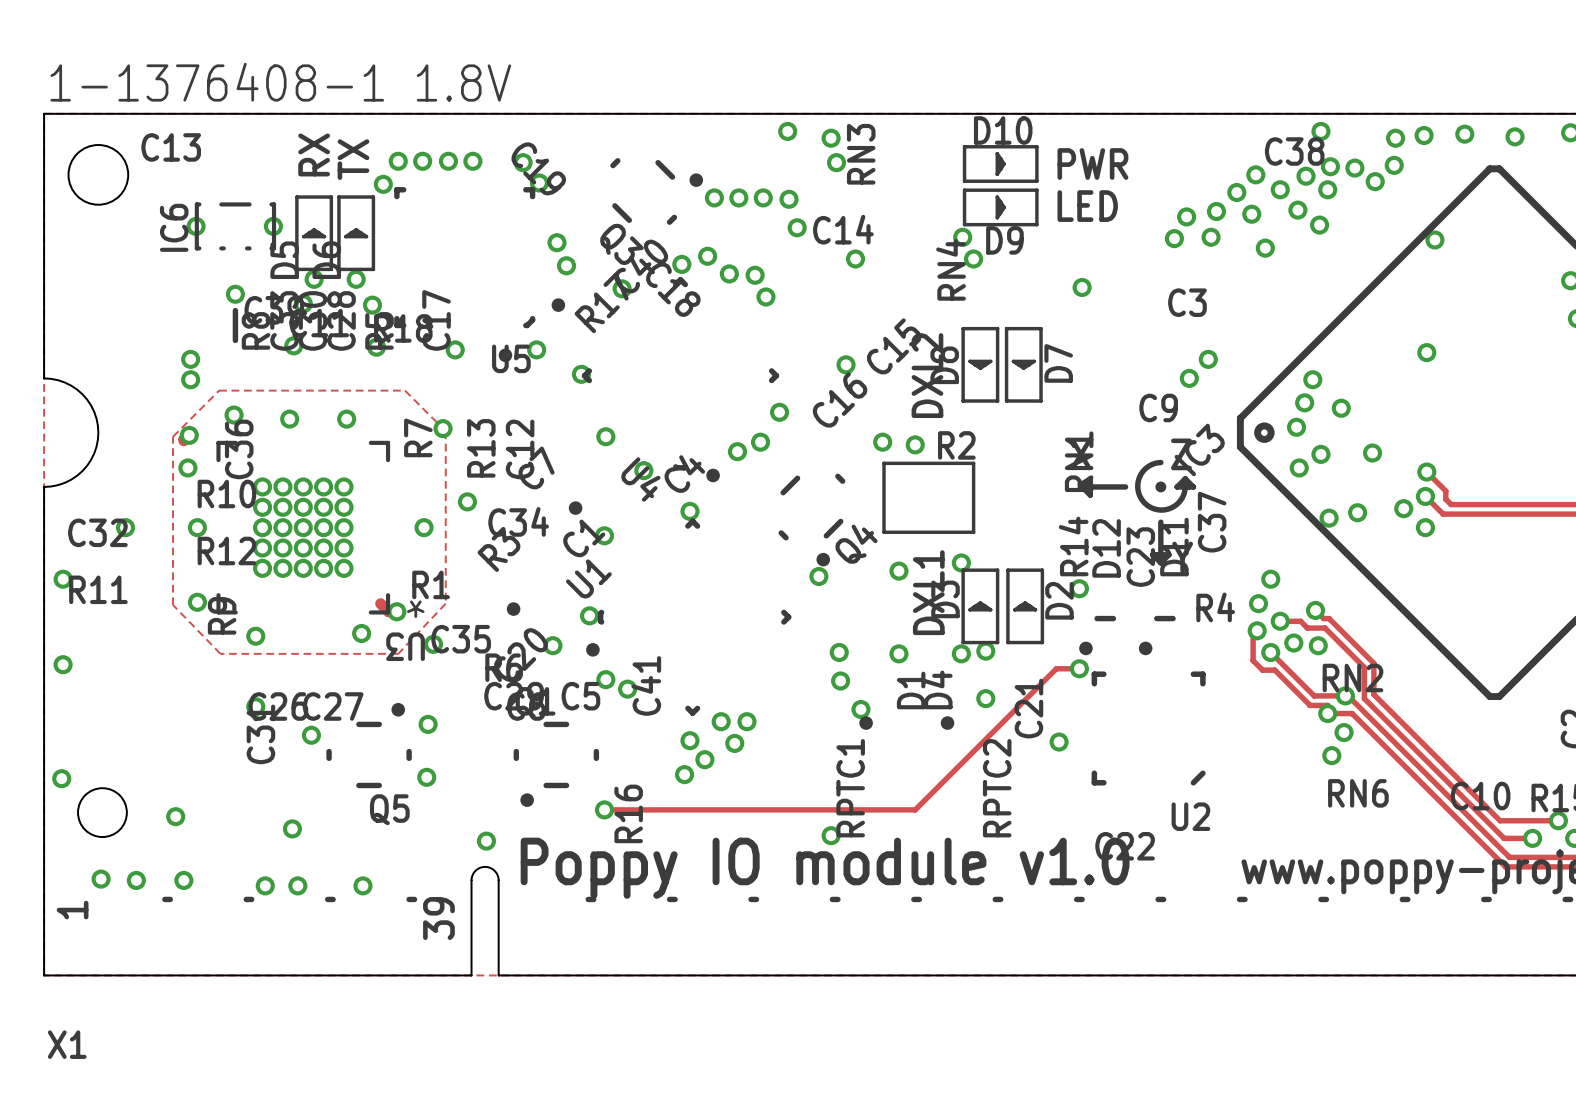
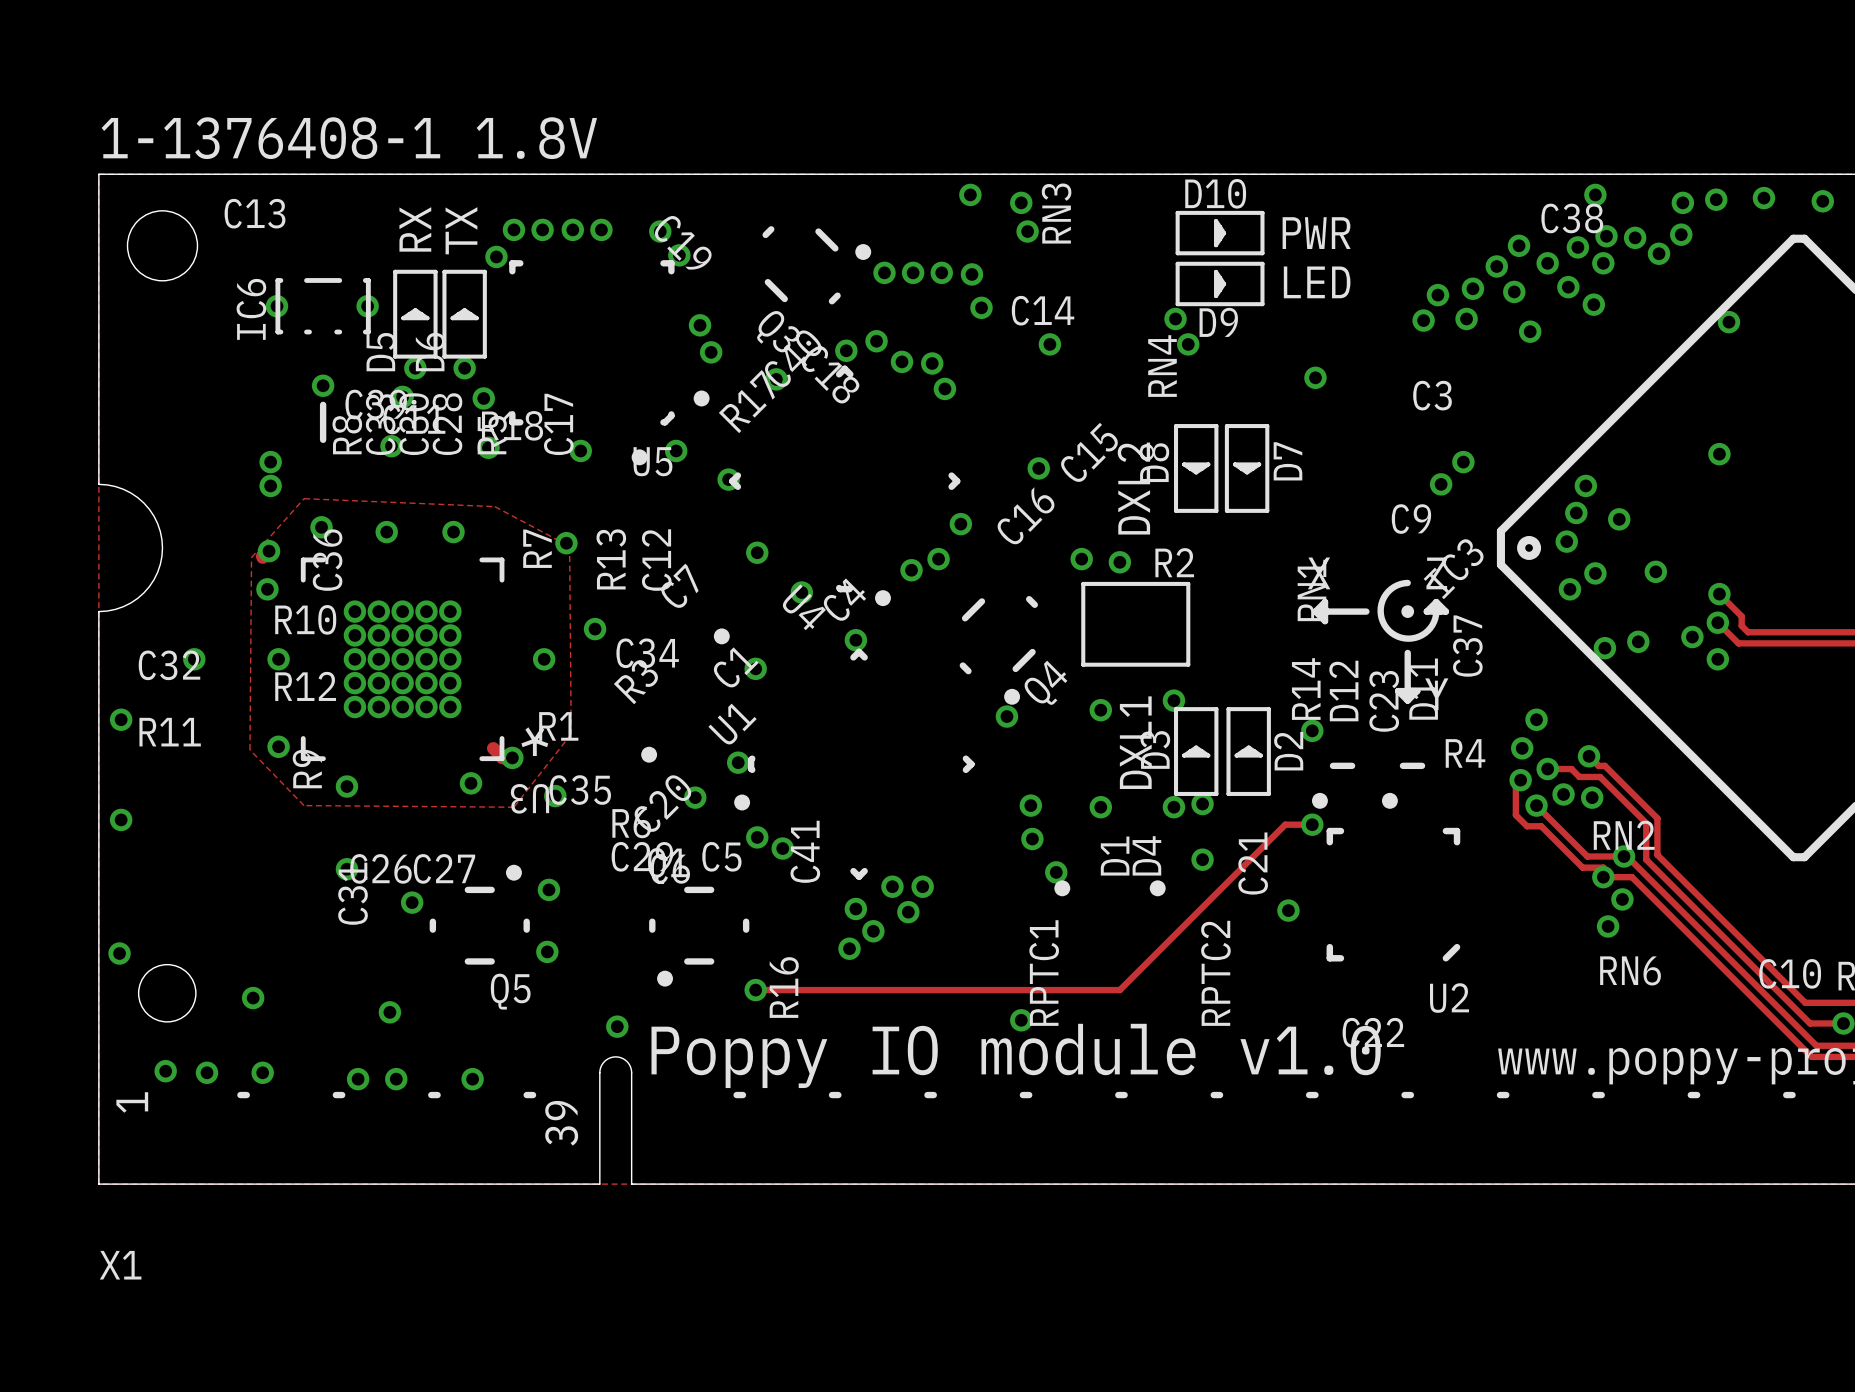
zone outline: (219, 390) (405, 390) (445, 431) (445, 603) (398, 653) (220, 653) (173, 605) (173, 436) (219, 390) -> (304, 498) (251, 557) (249, 749) (304, 805) (513, 807) (571, 734) (569, 546) (494, 506) (304, 498)

